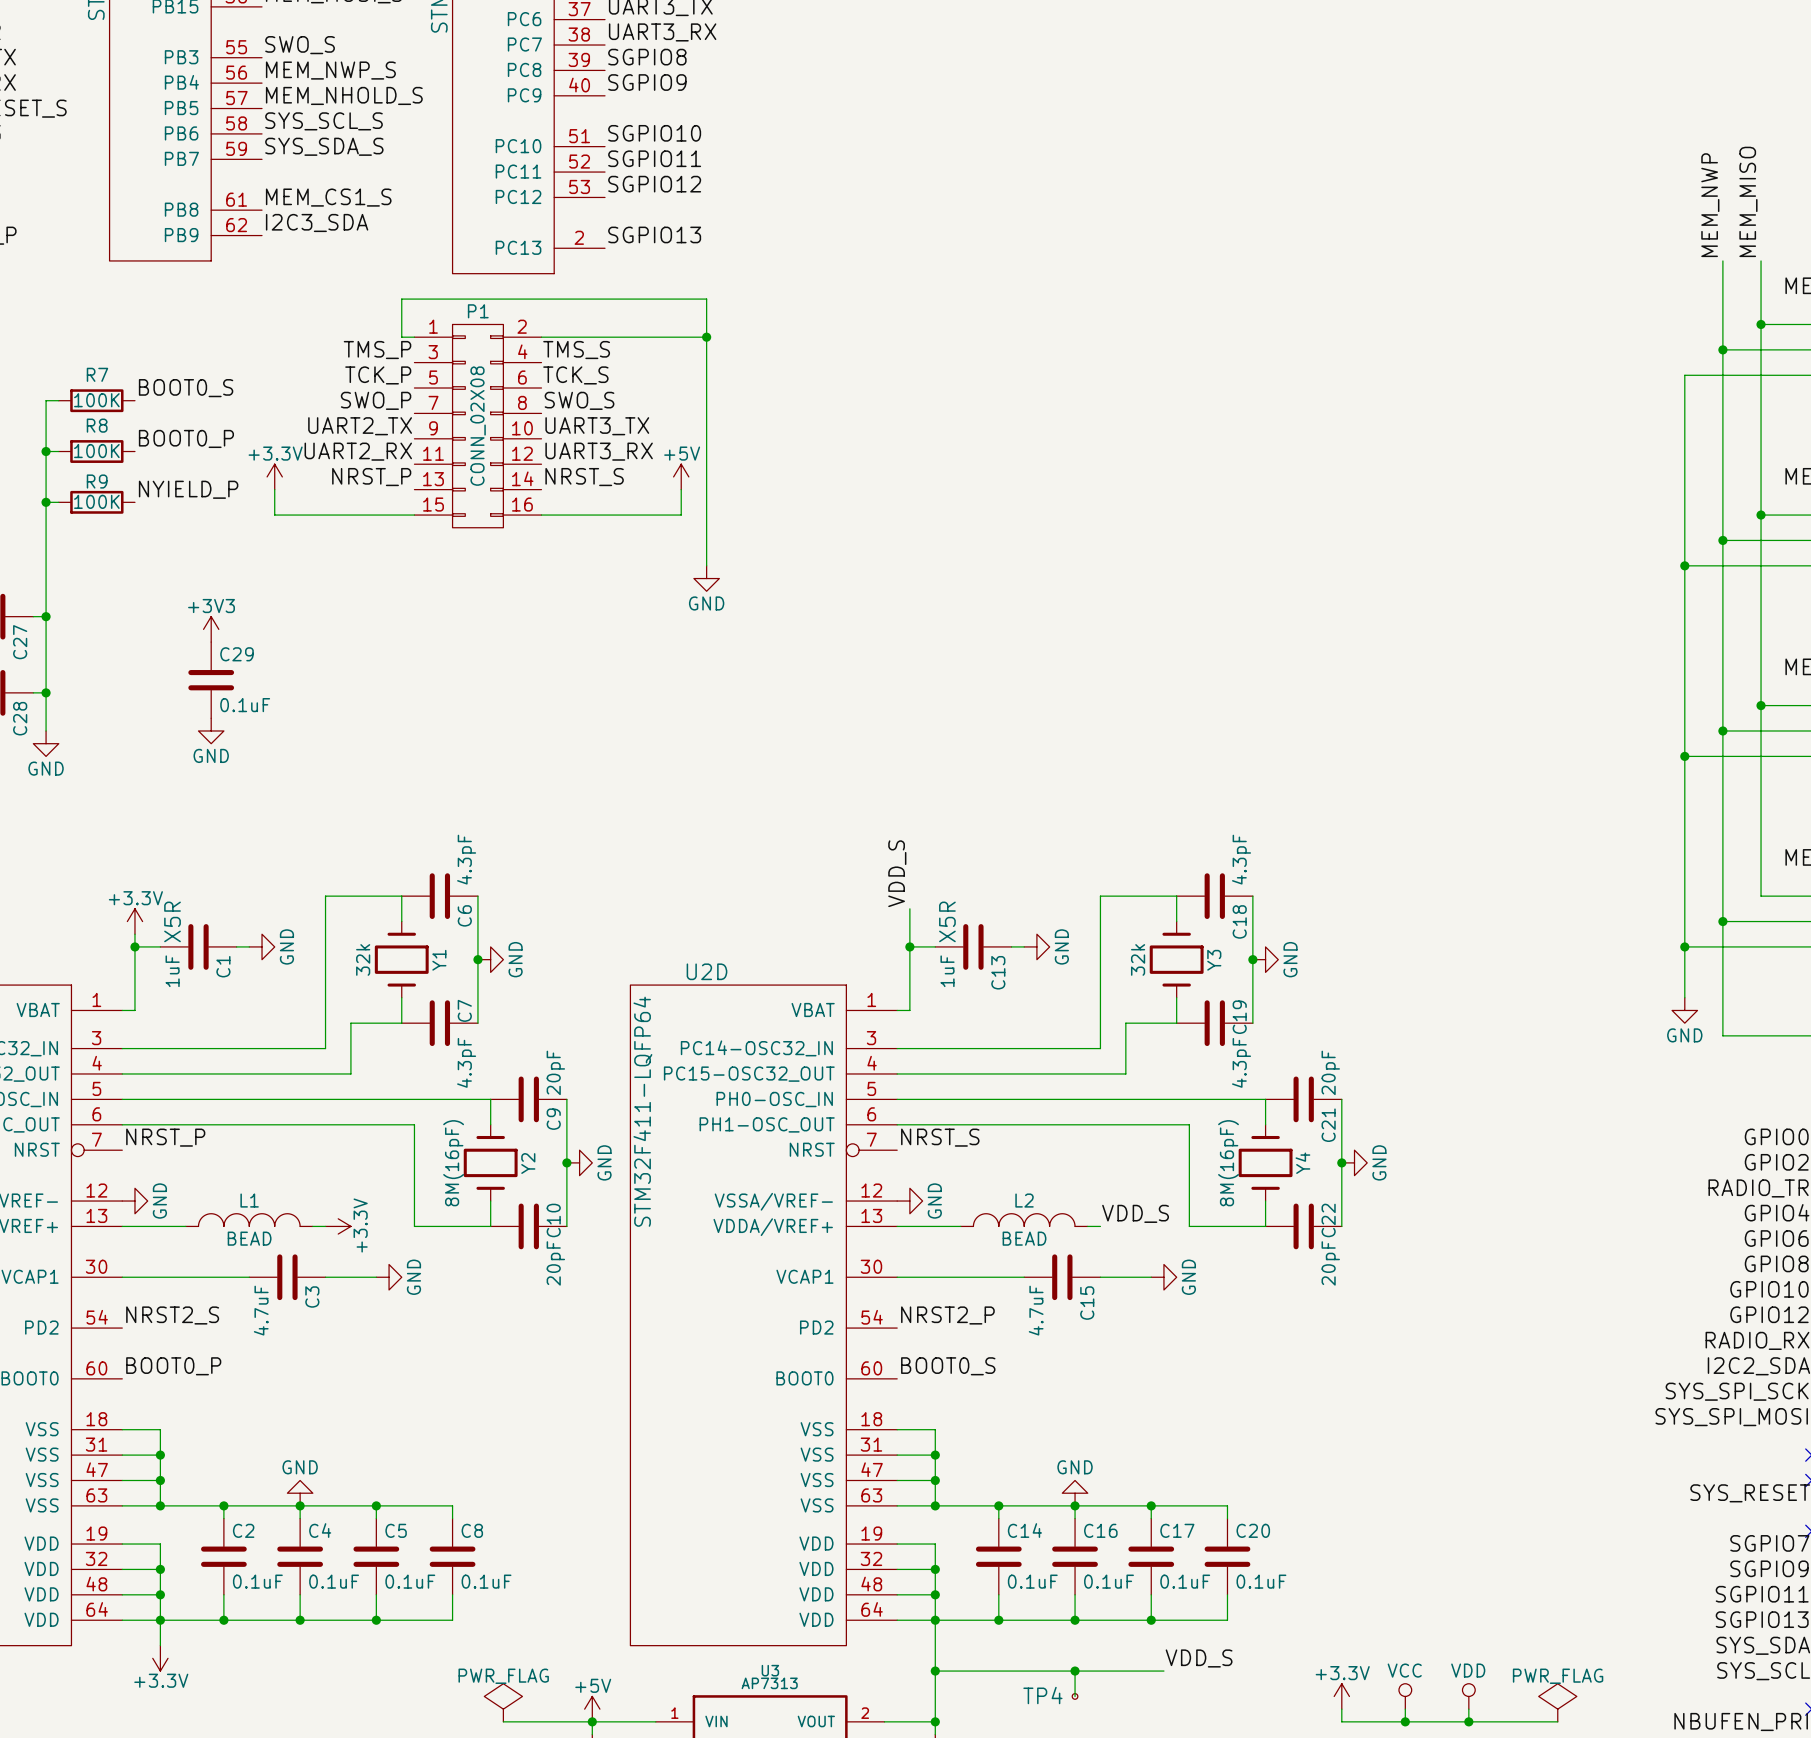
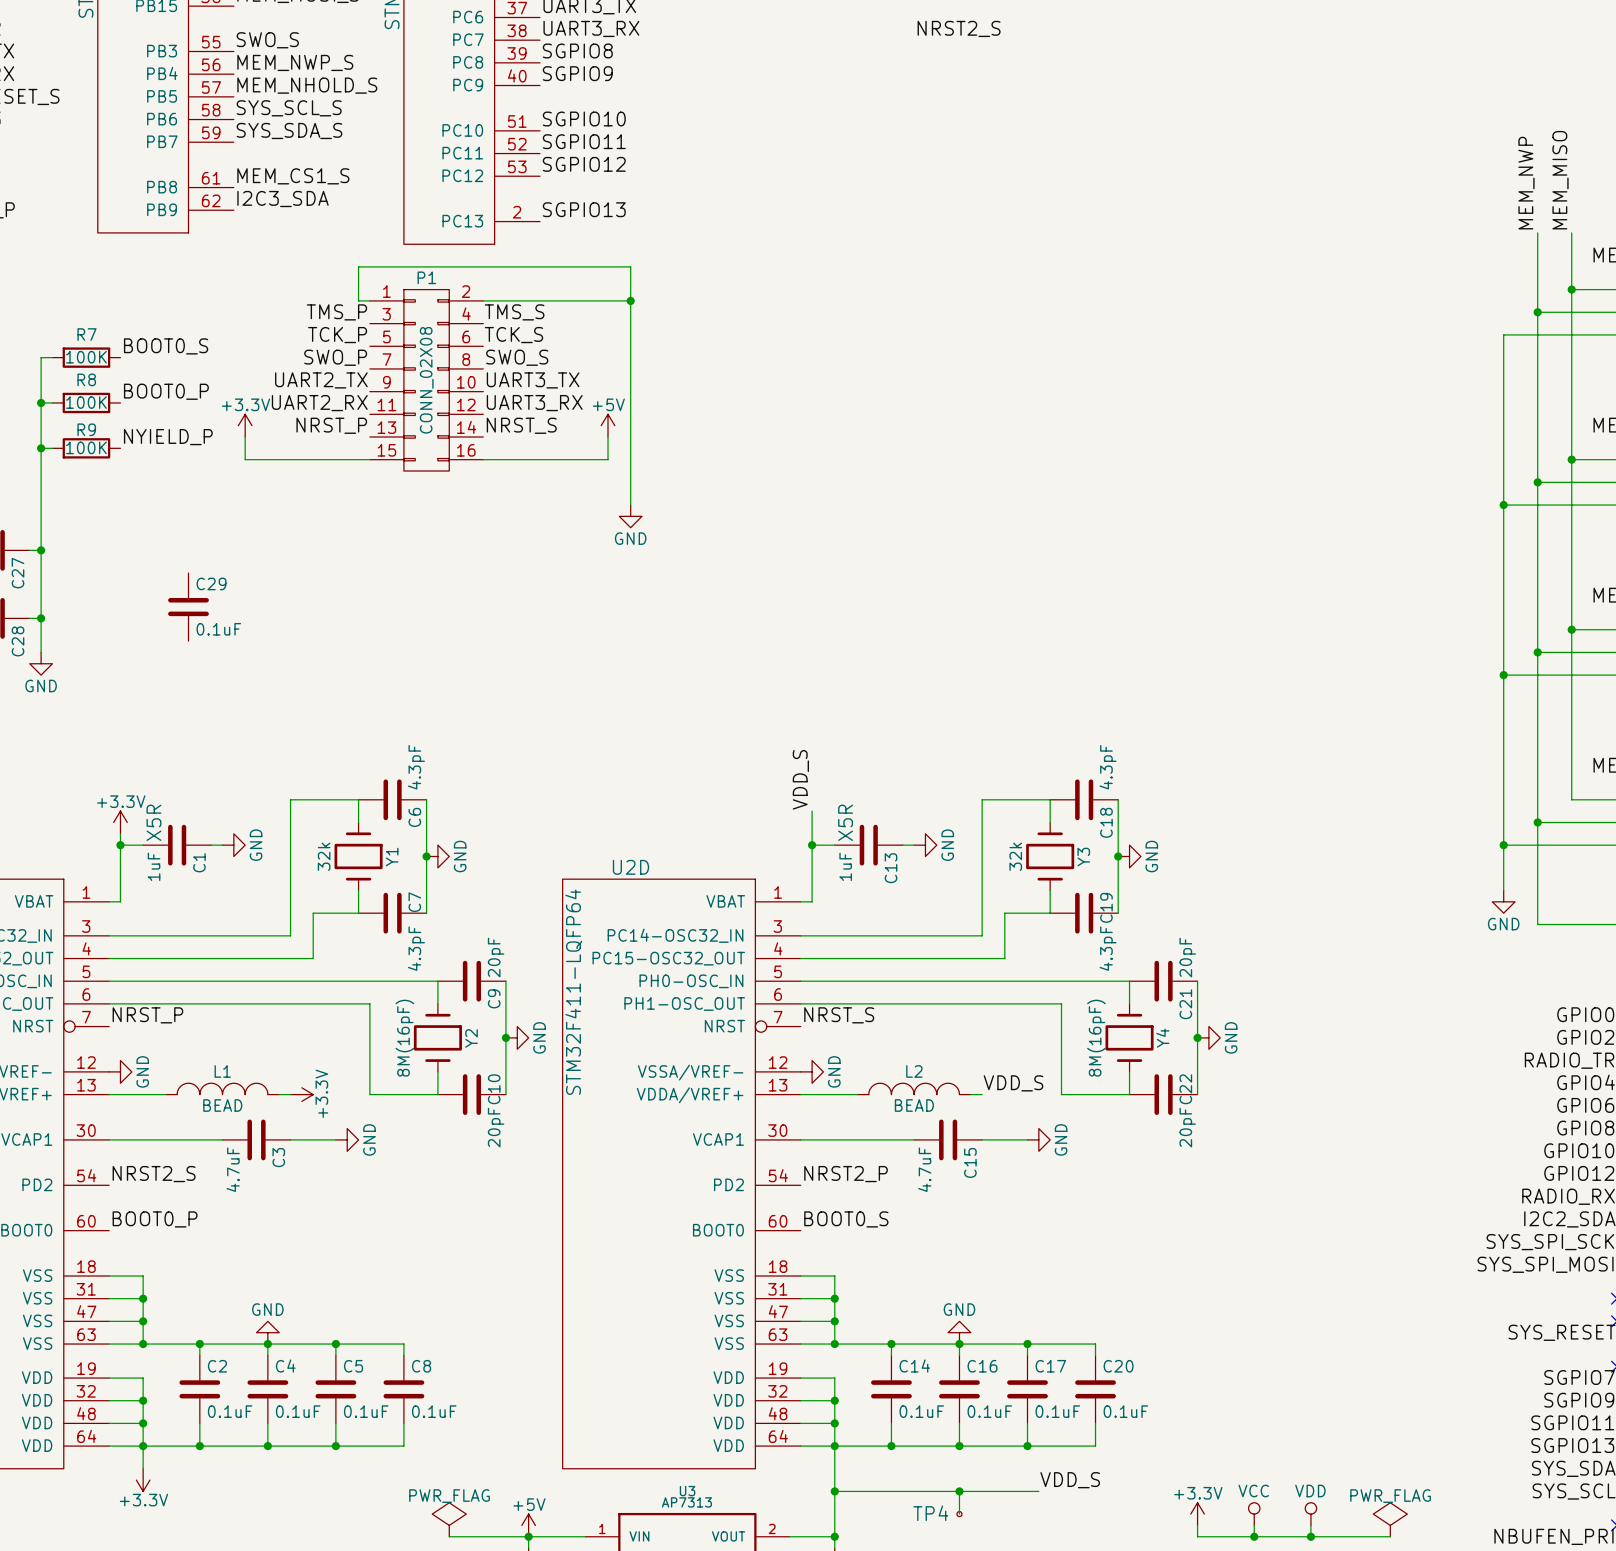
label: none -> NRST2_S (959, 28)
power symbol: +3V3 (211, 629) -> none
power symbol: GND (211, 730) -> none

